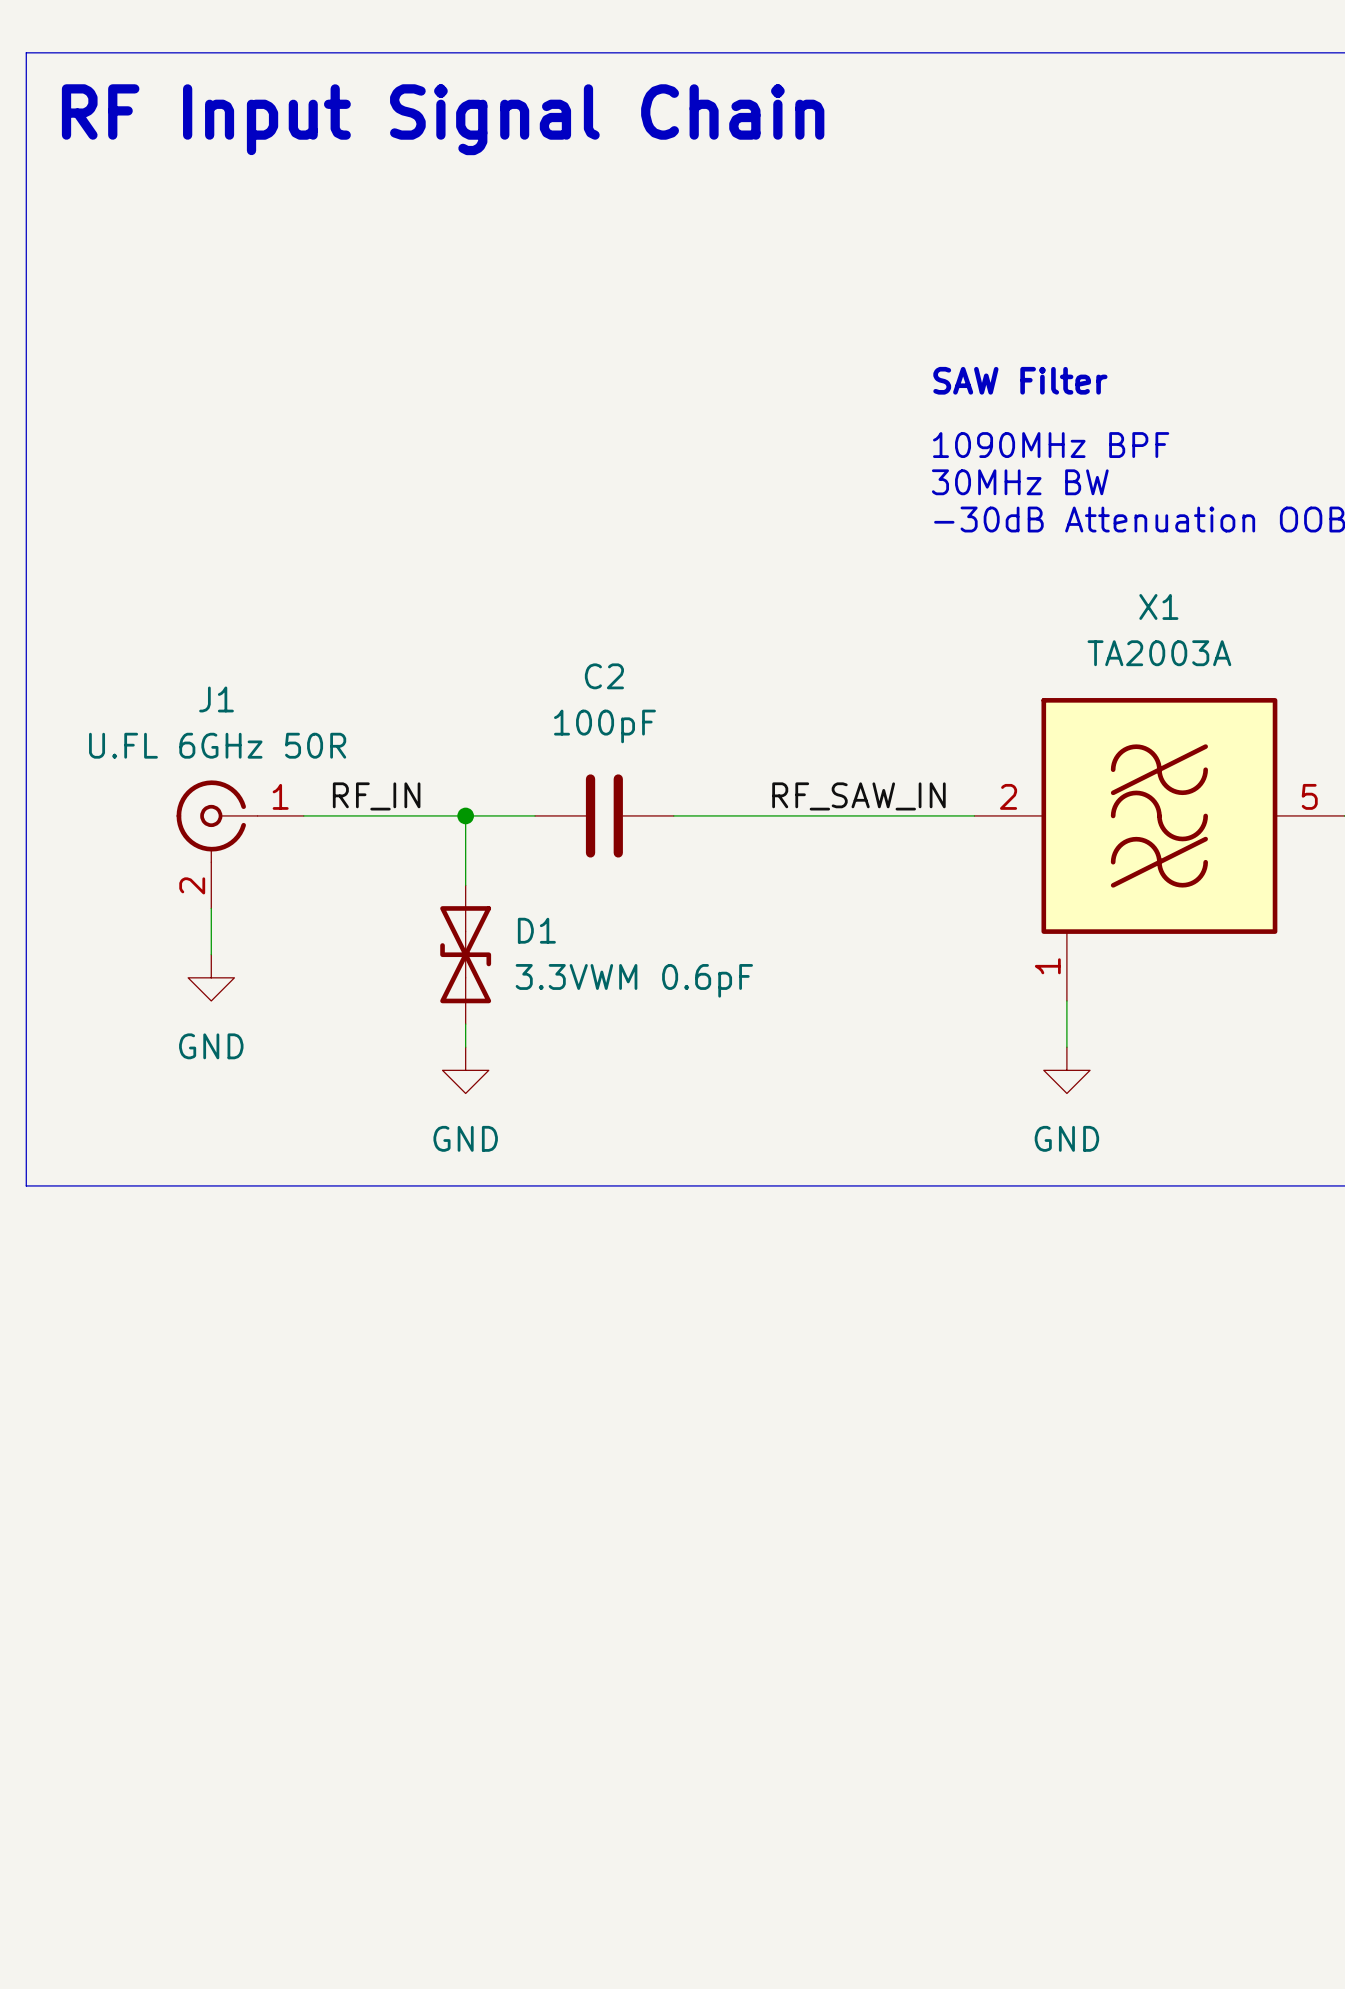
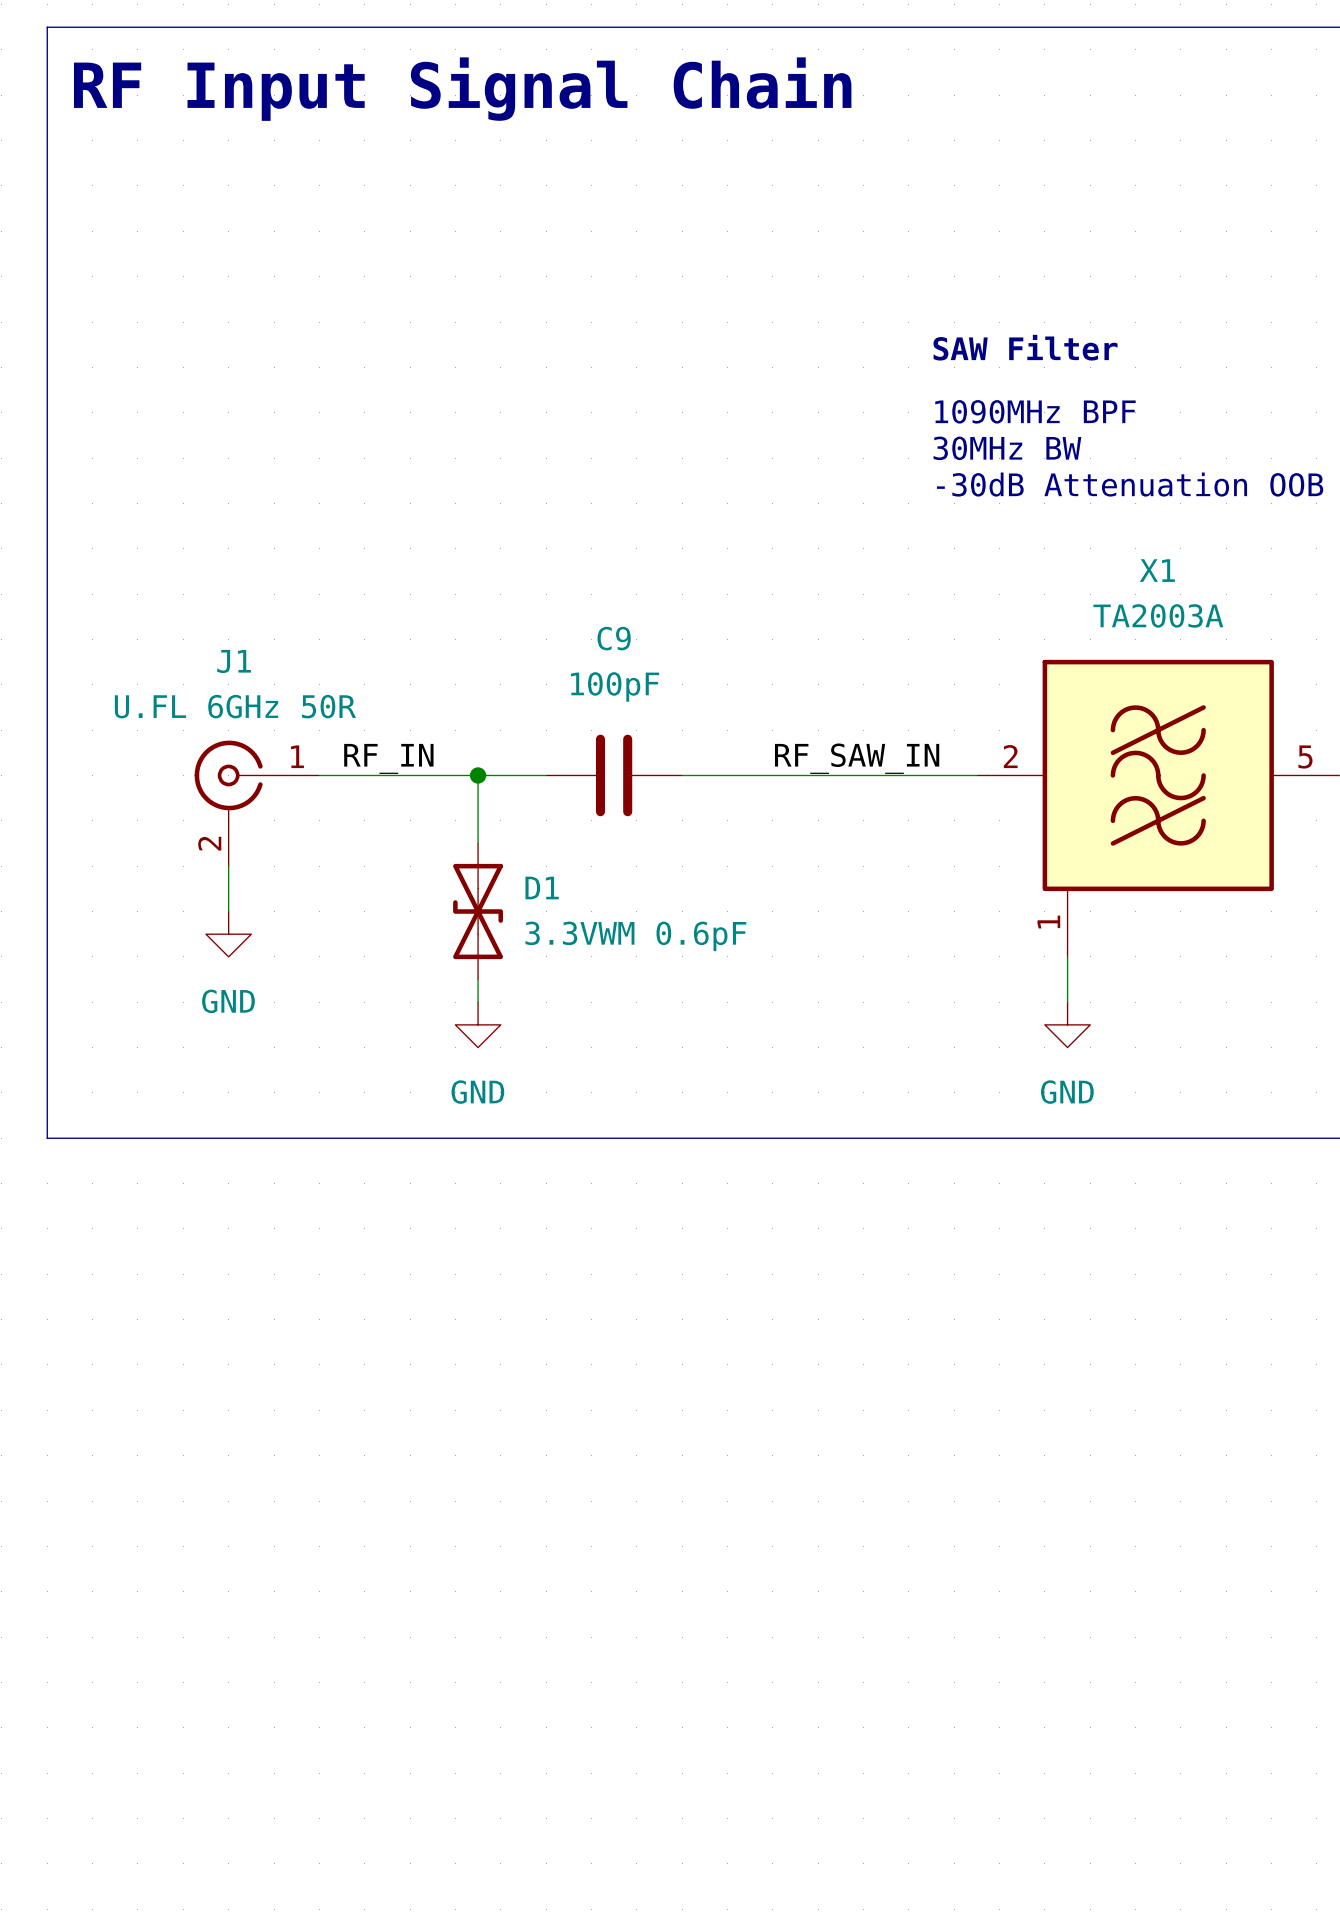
C2 name: C2 (604, 676) -> C9 (614, 638)

